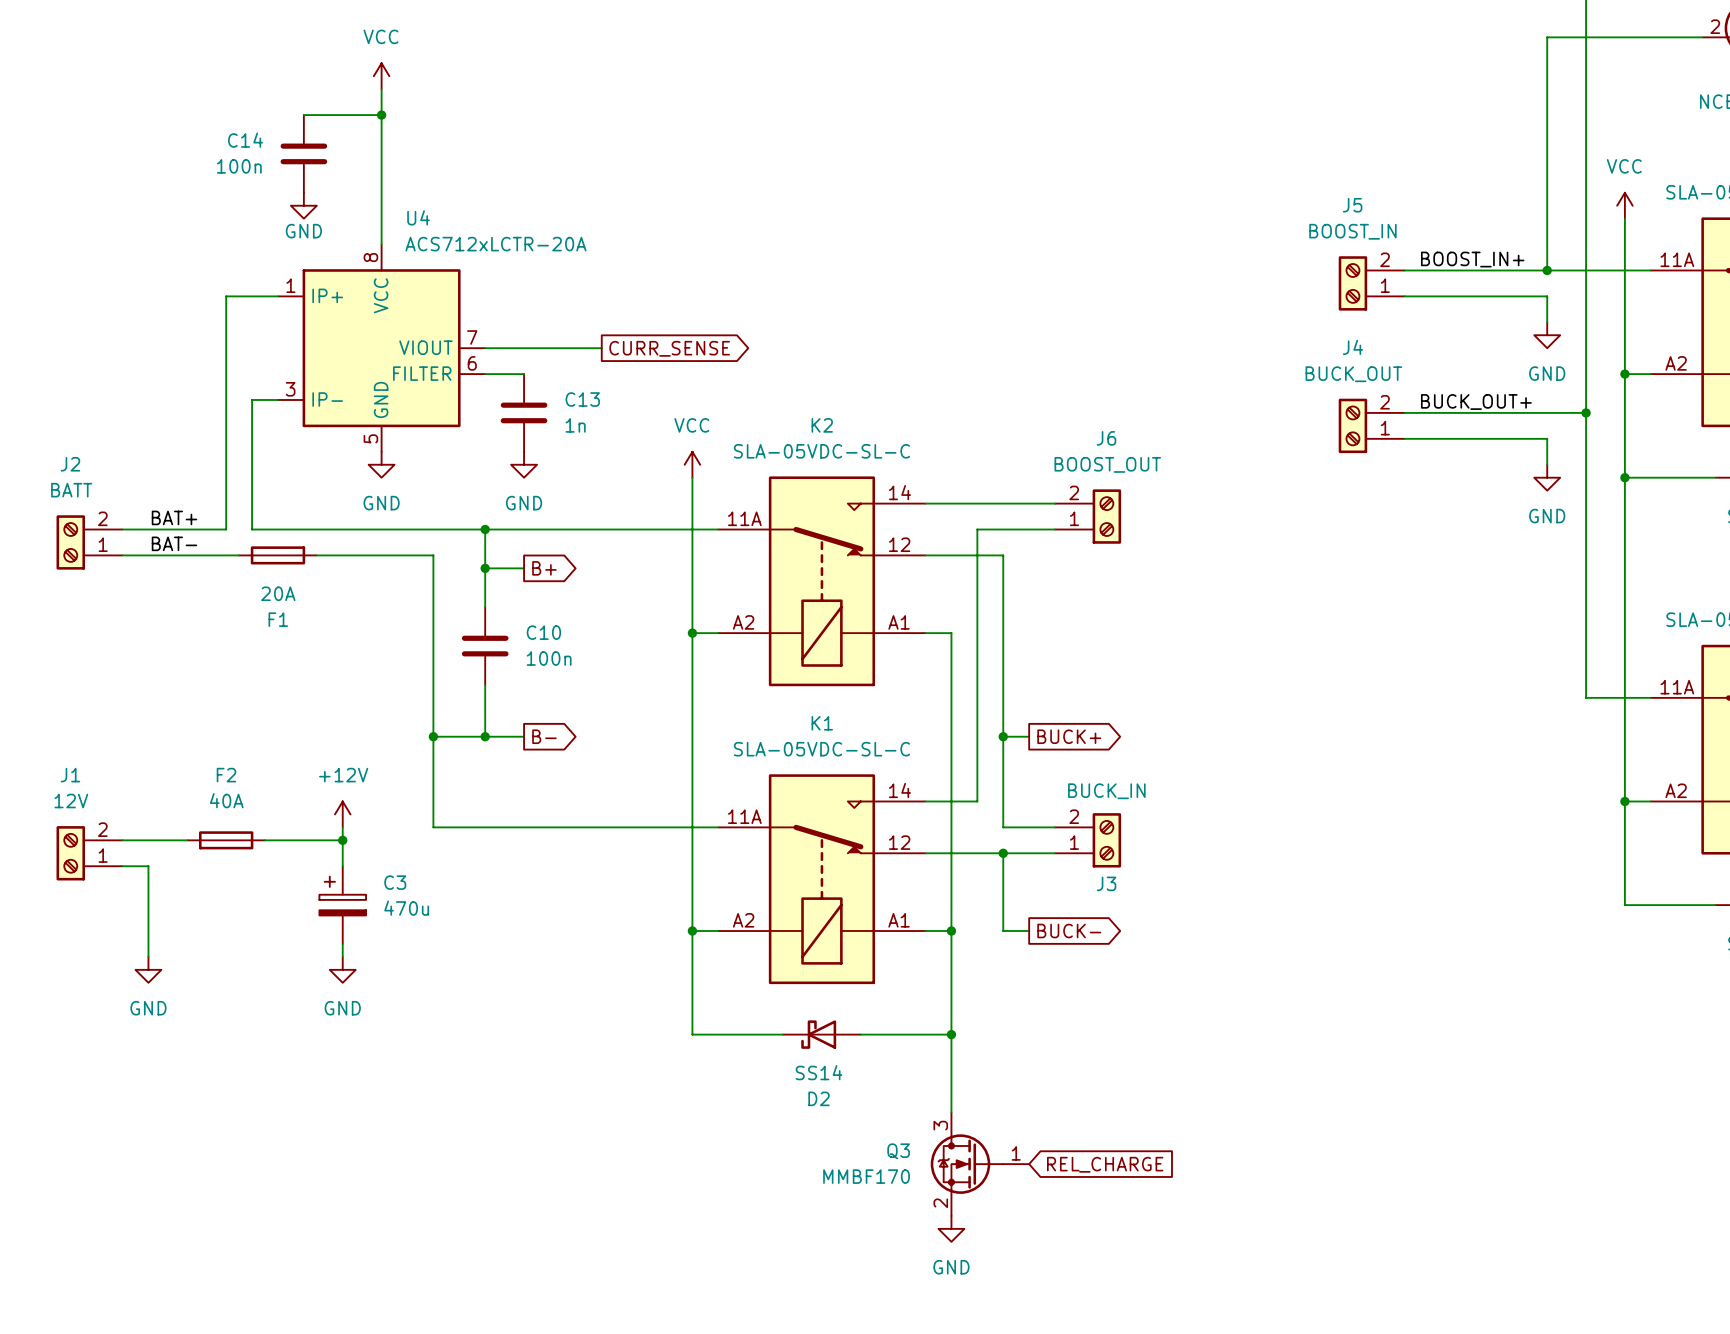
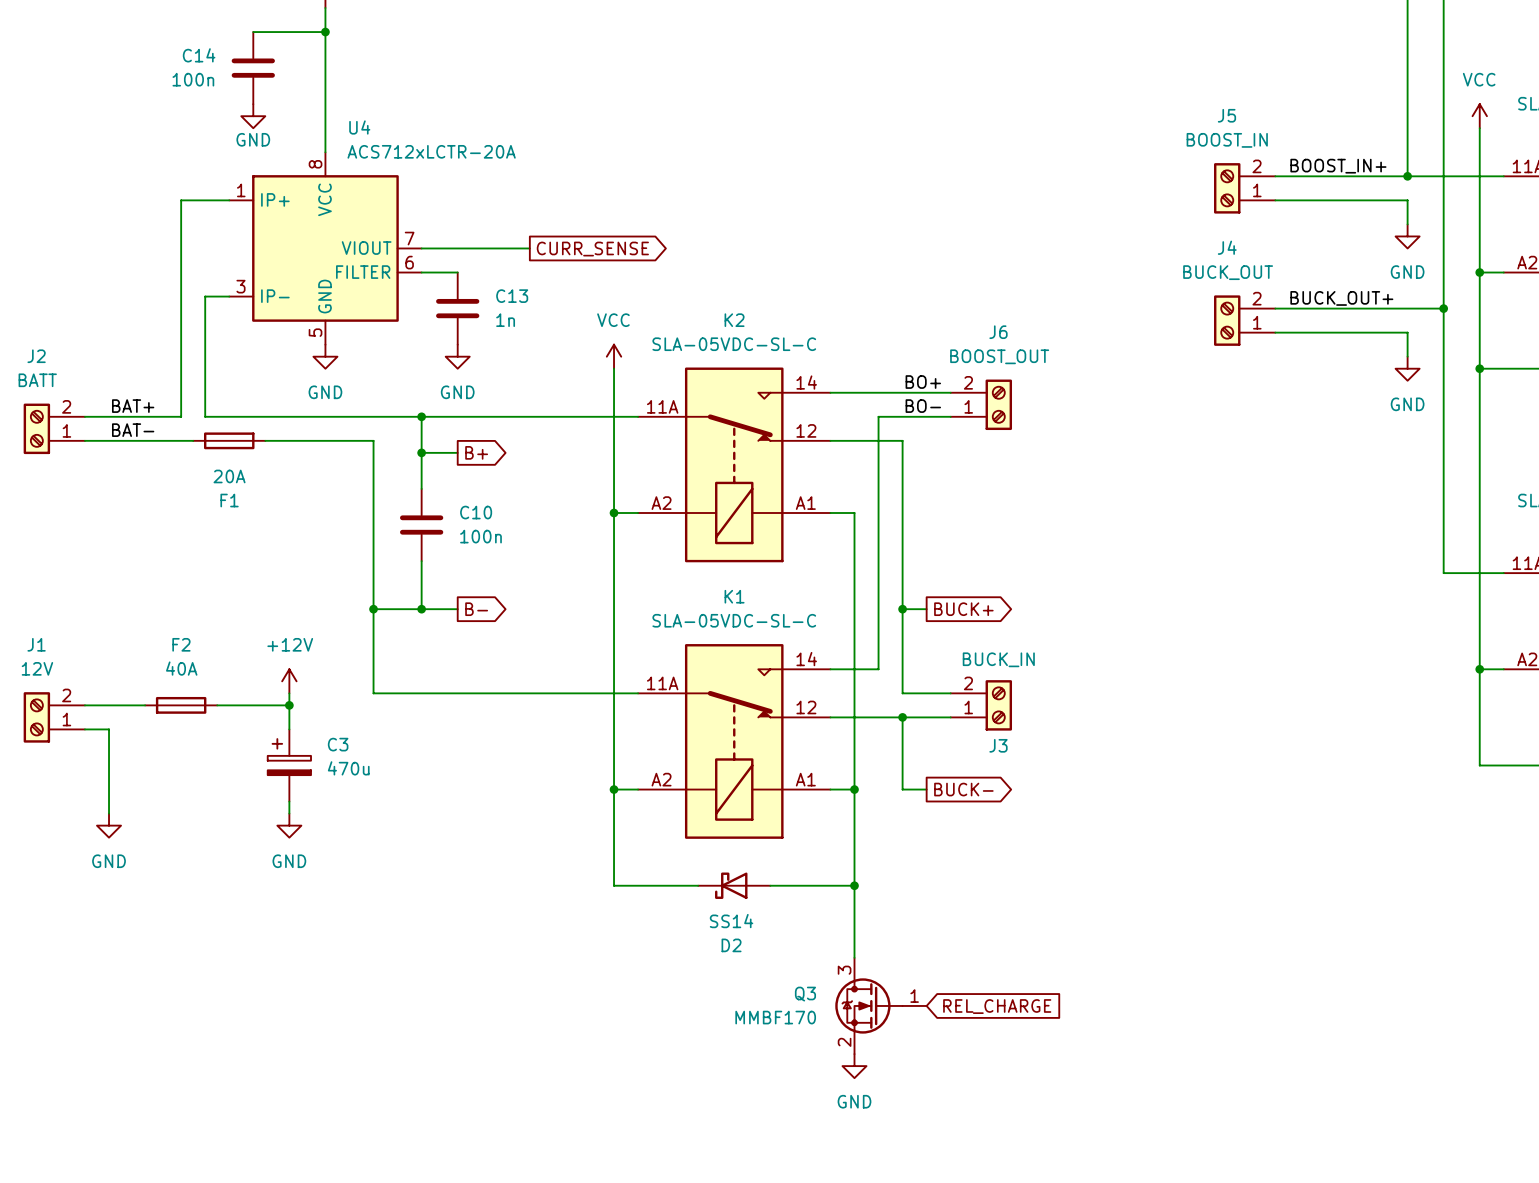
label: none -> BO+ (923, 382)
label: none -> BO- (923, 406)

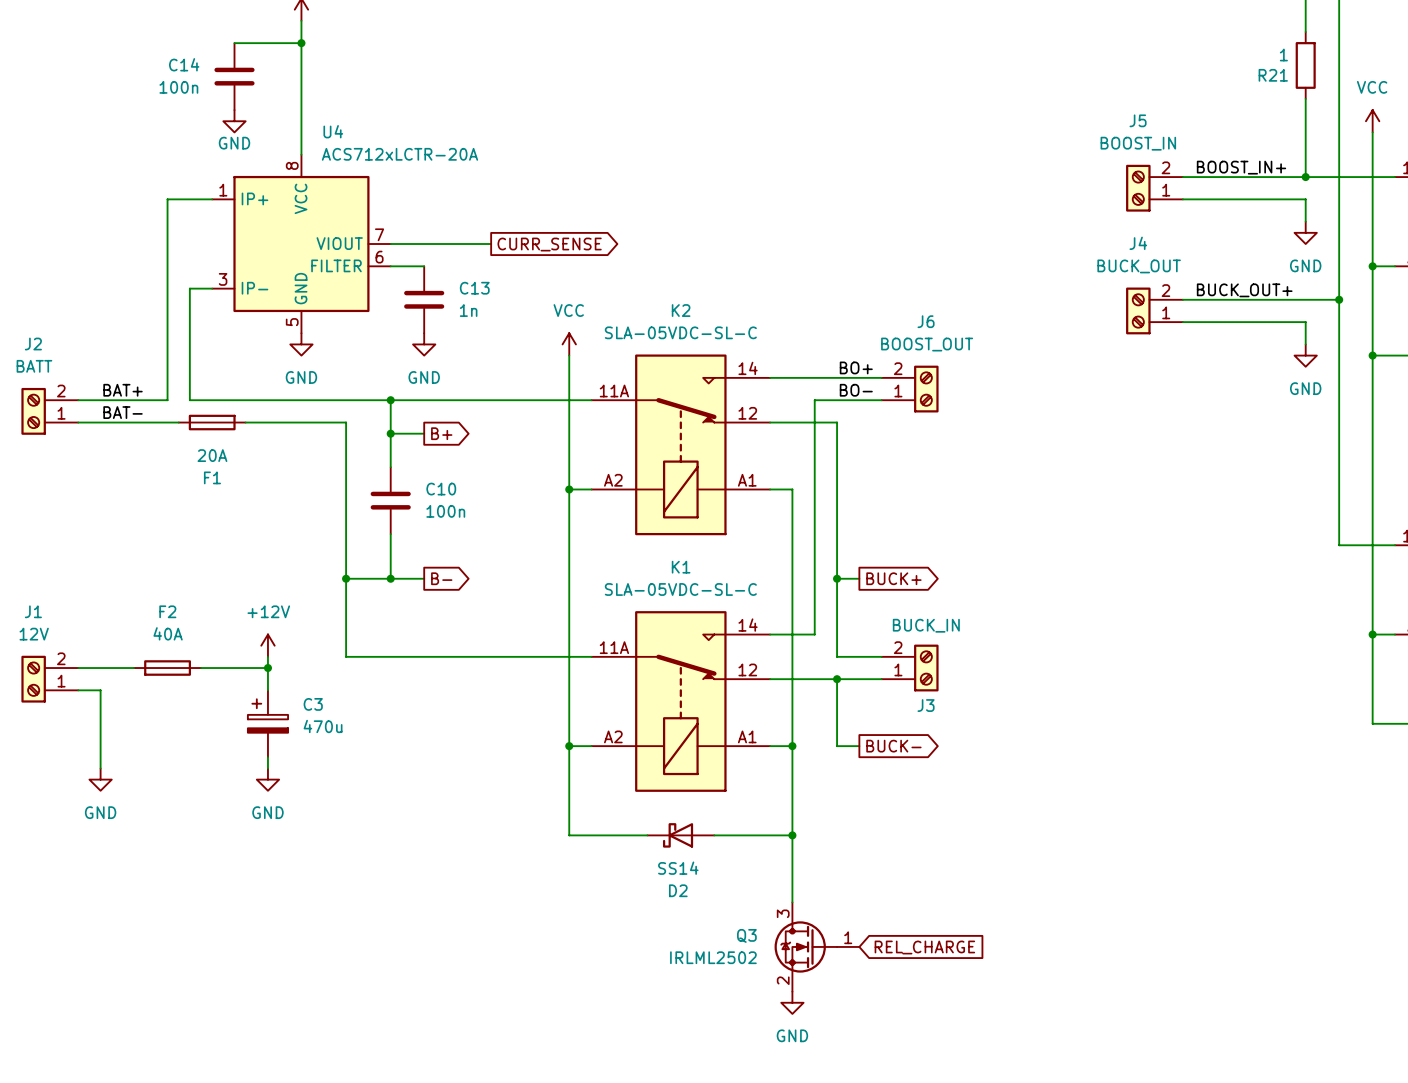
wire: (1407, 20) (1407, 92) -> none
R21: none -> 1 (1305, 65)
Q3 value: MMBF170 (775, 1017) -> IRLML2502 (713, 957)

